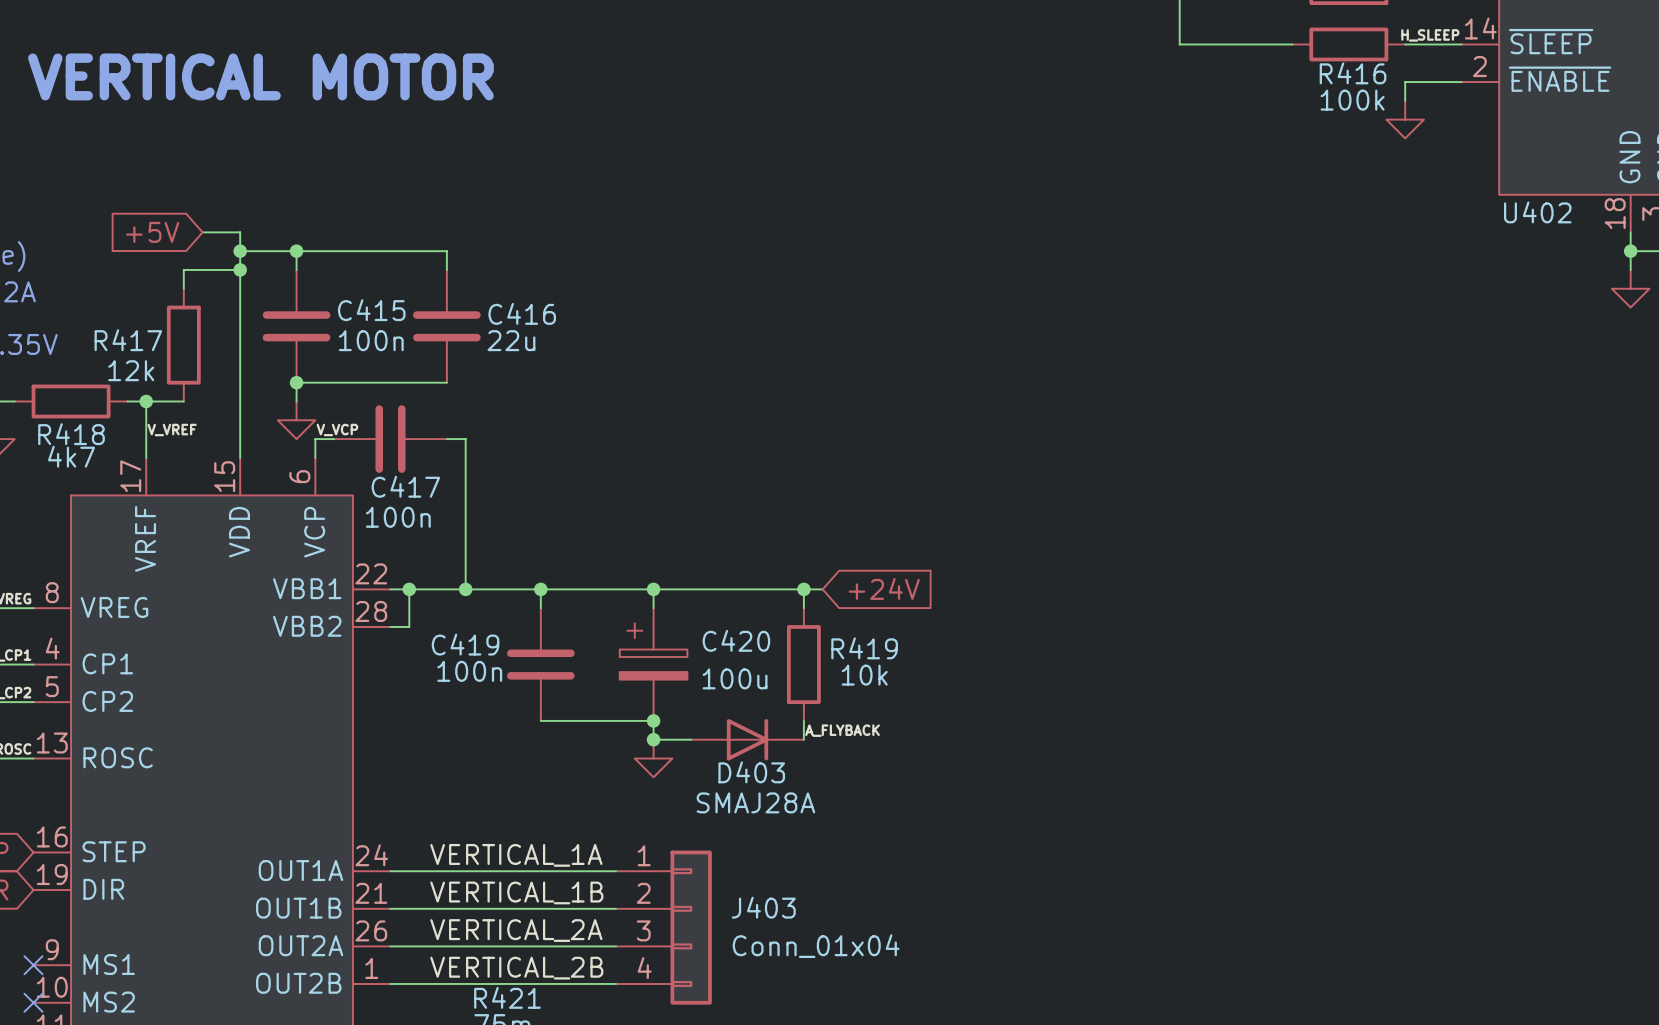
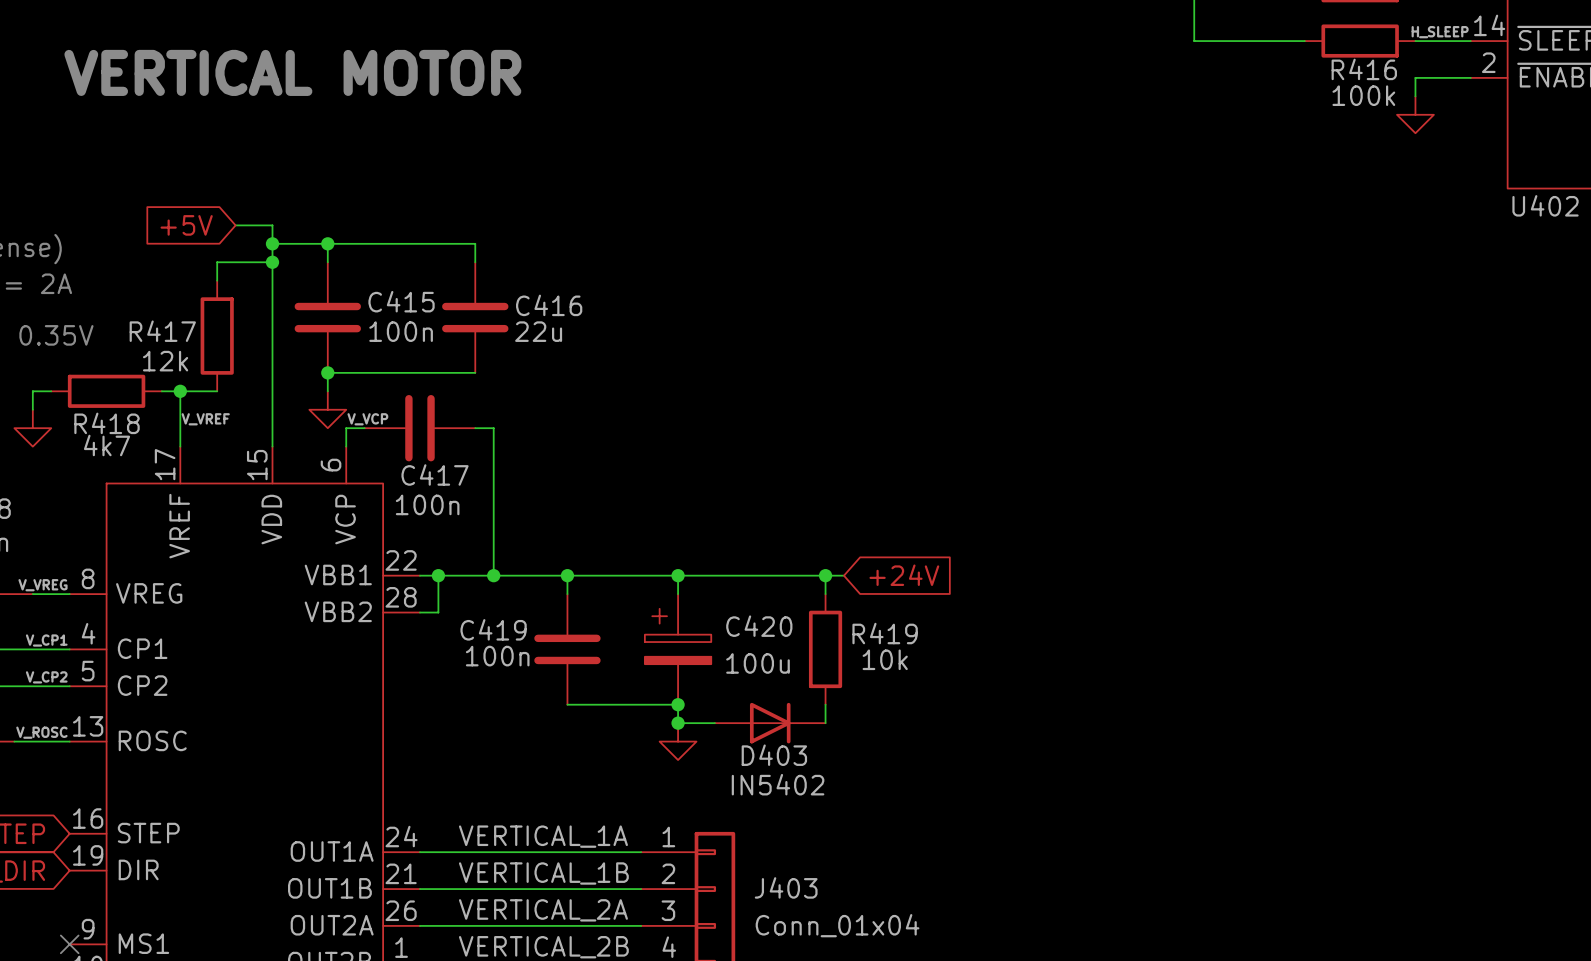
label: A_FLYBACK (842, 730) -> none
D403 value: SMAJ28A (755, 802) -> IN5402 (778, 784)

